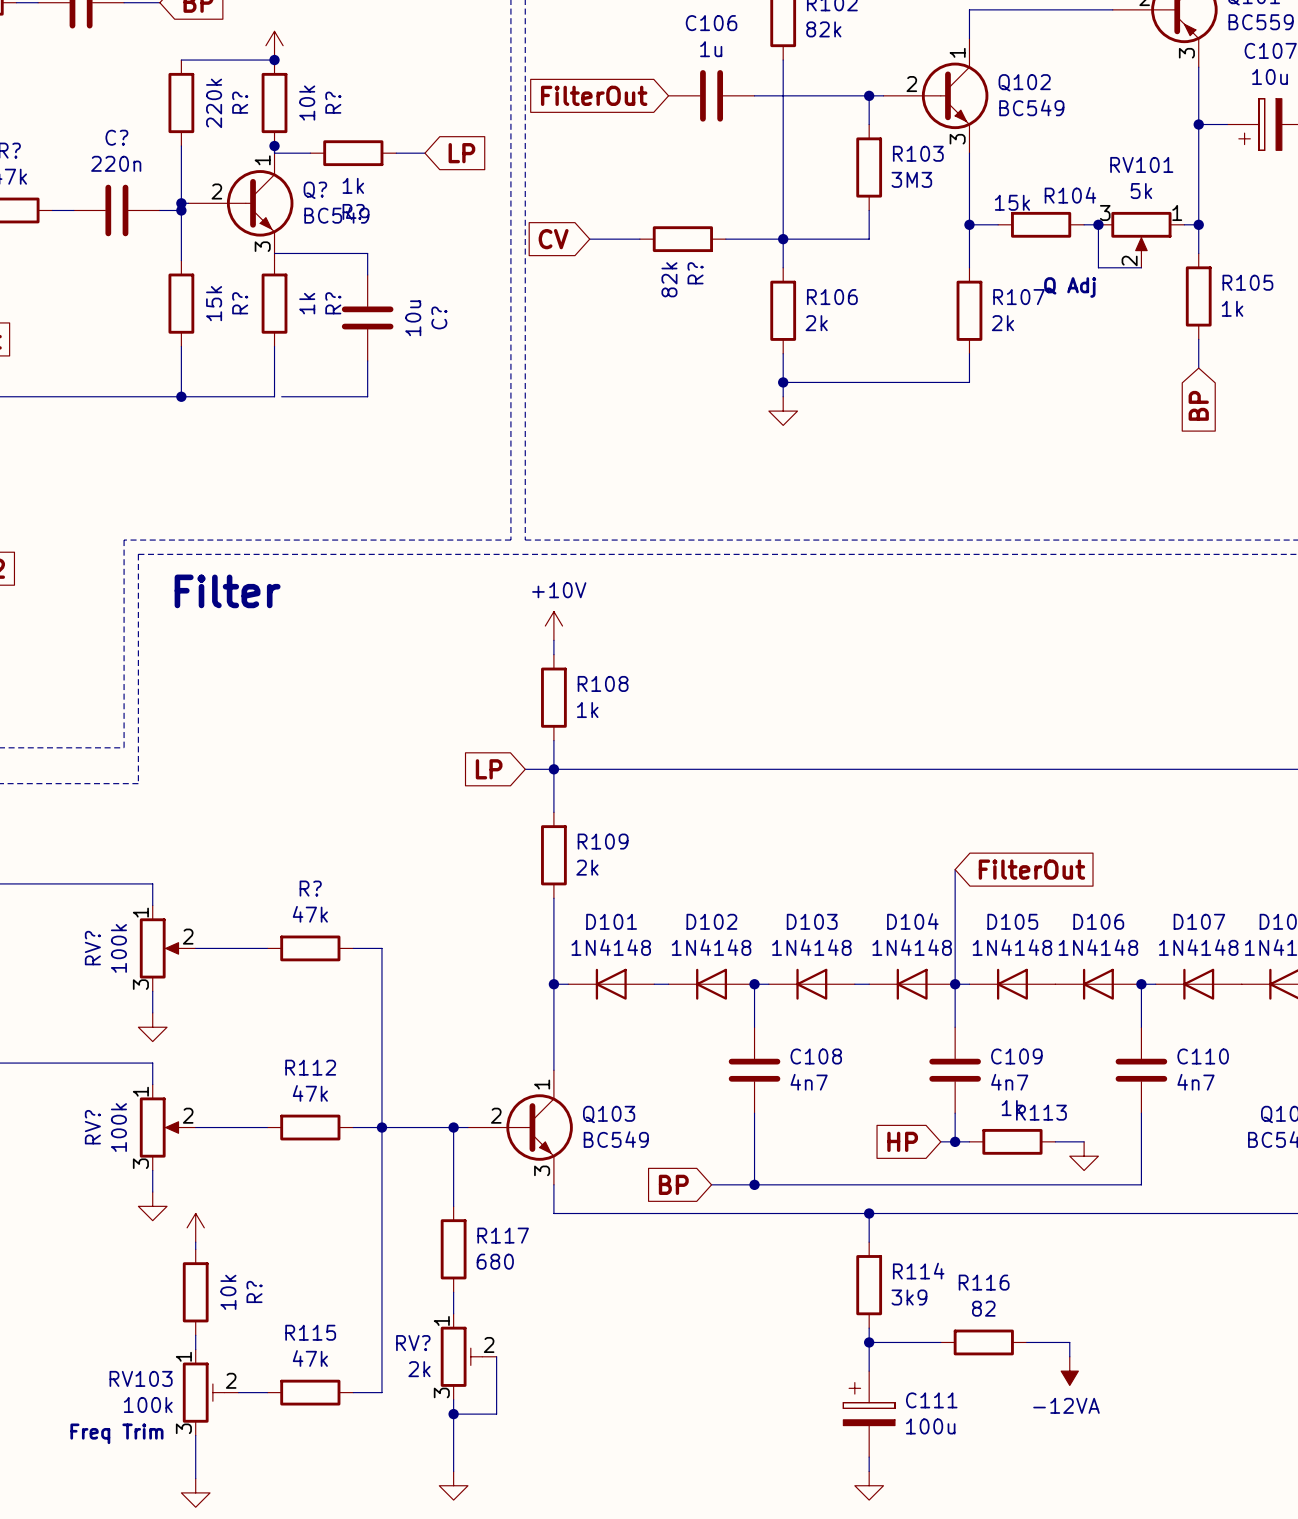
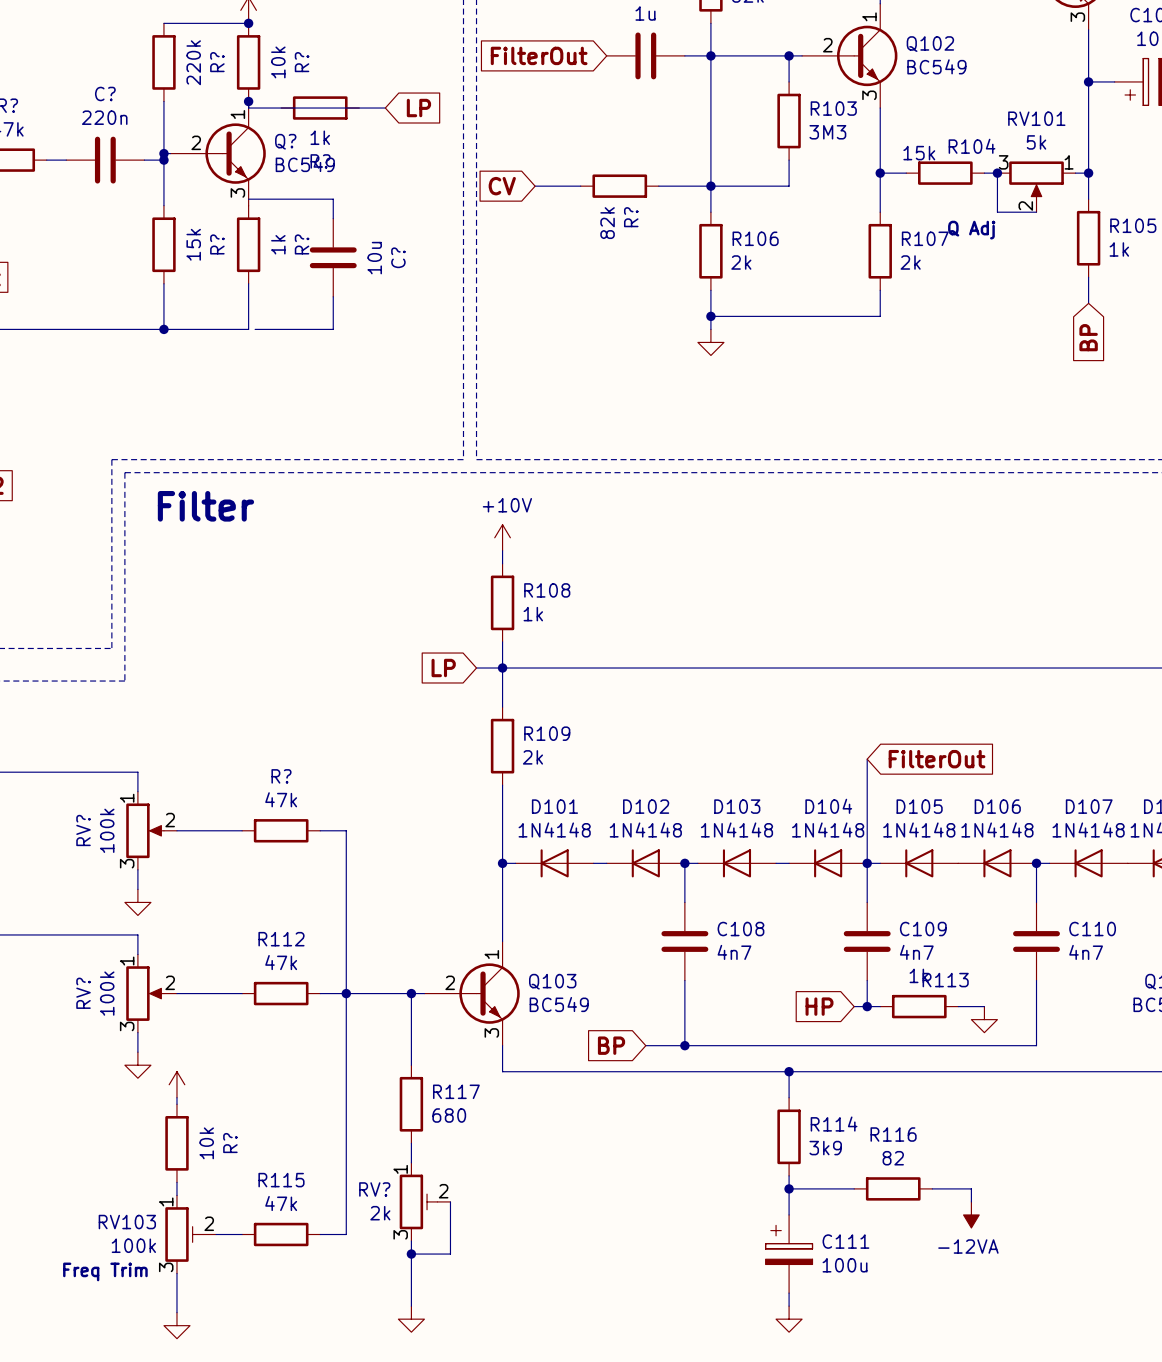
junction: none -> (710, 55)
wire: none -> (281, 108) (359, 108)

